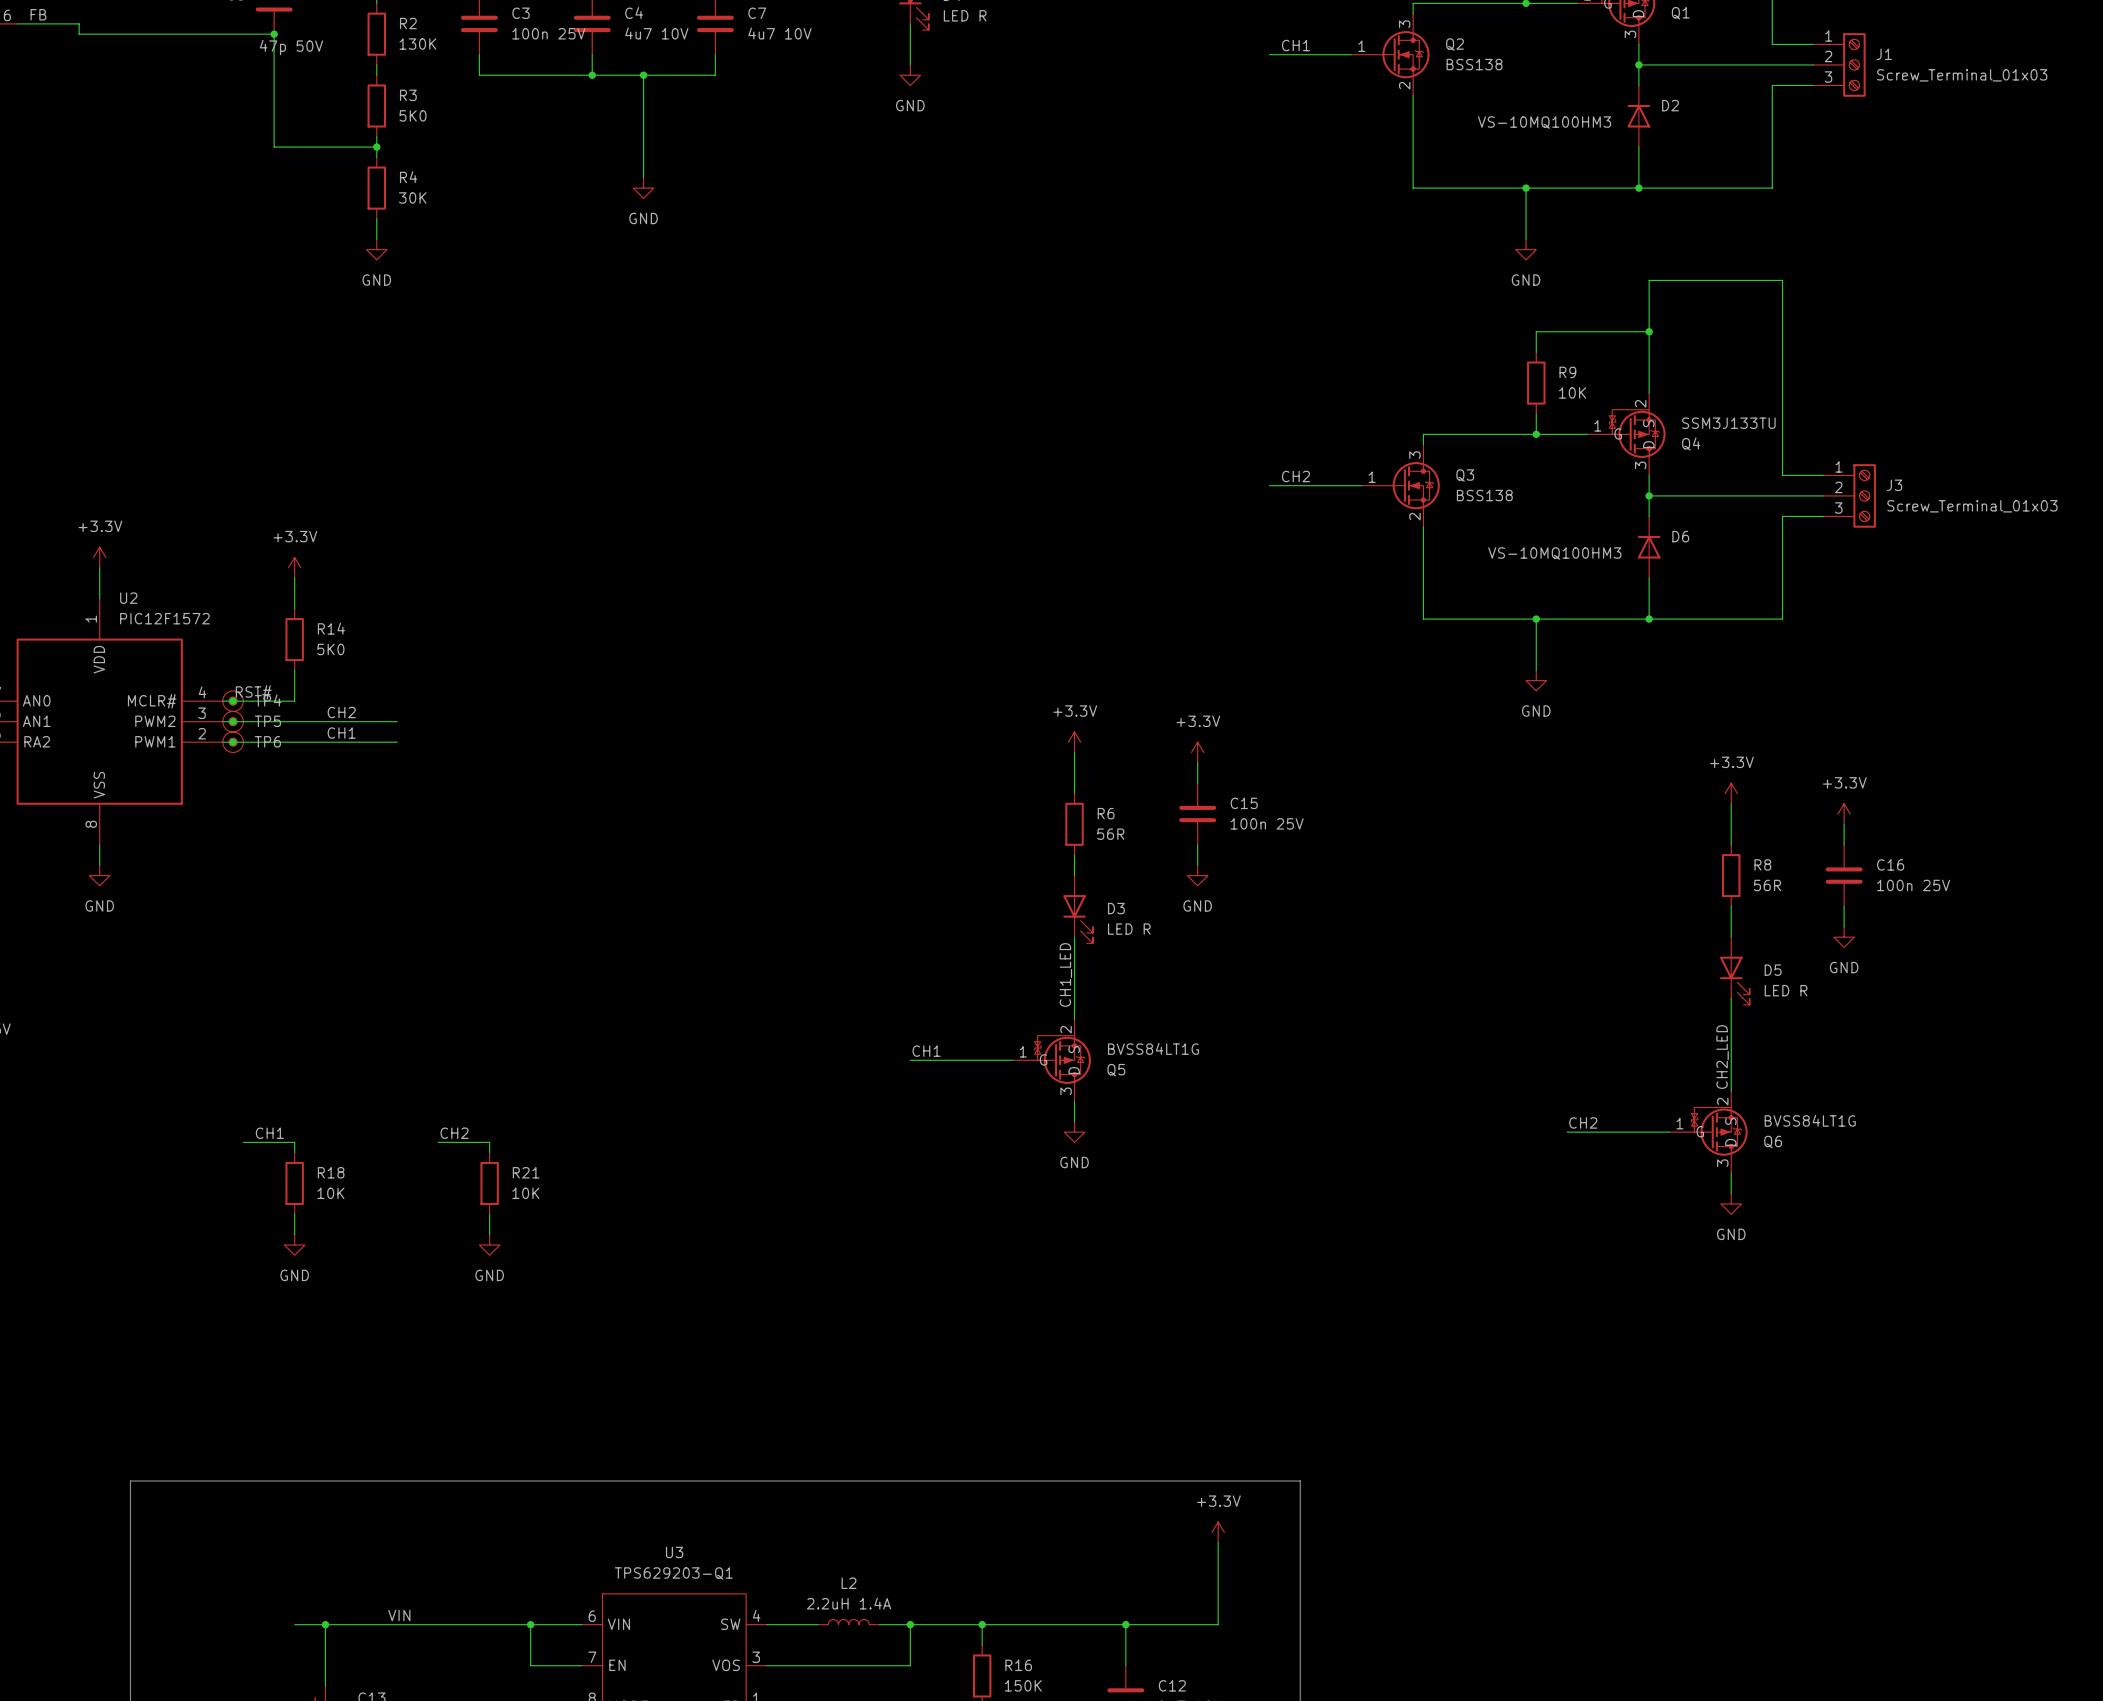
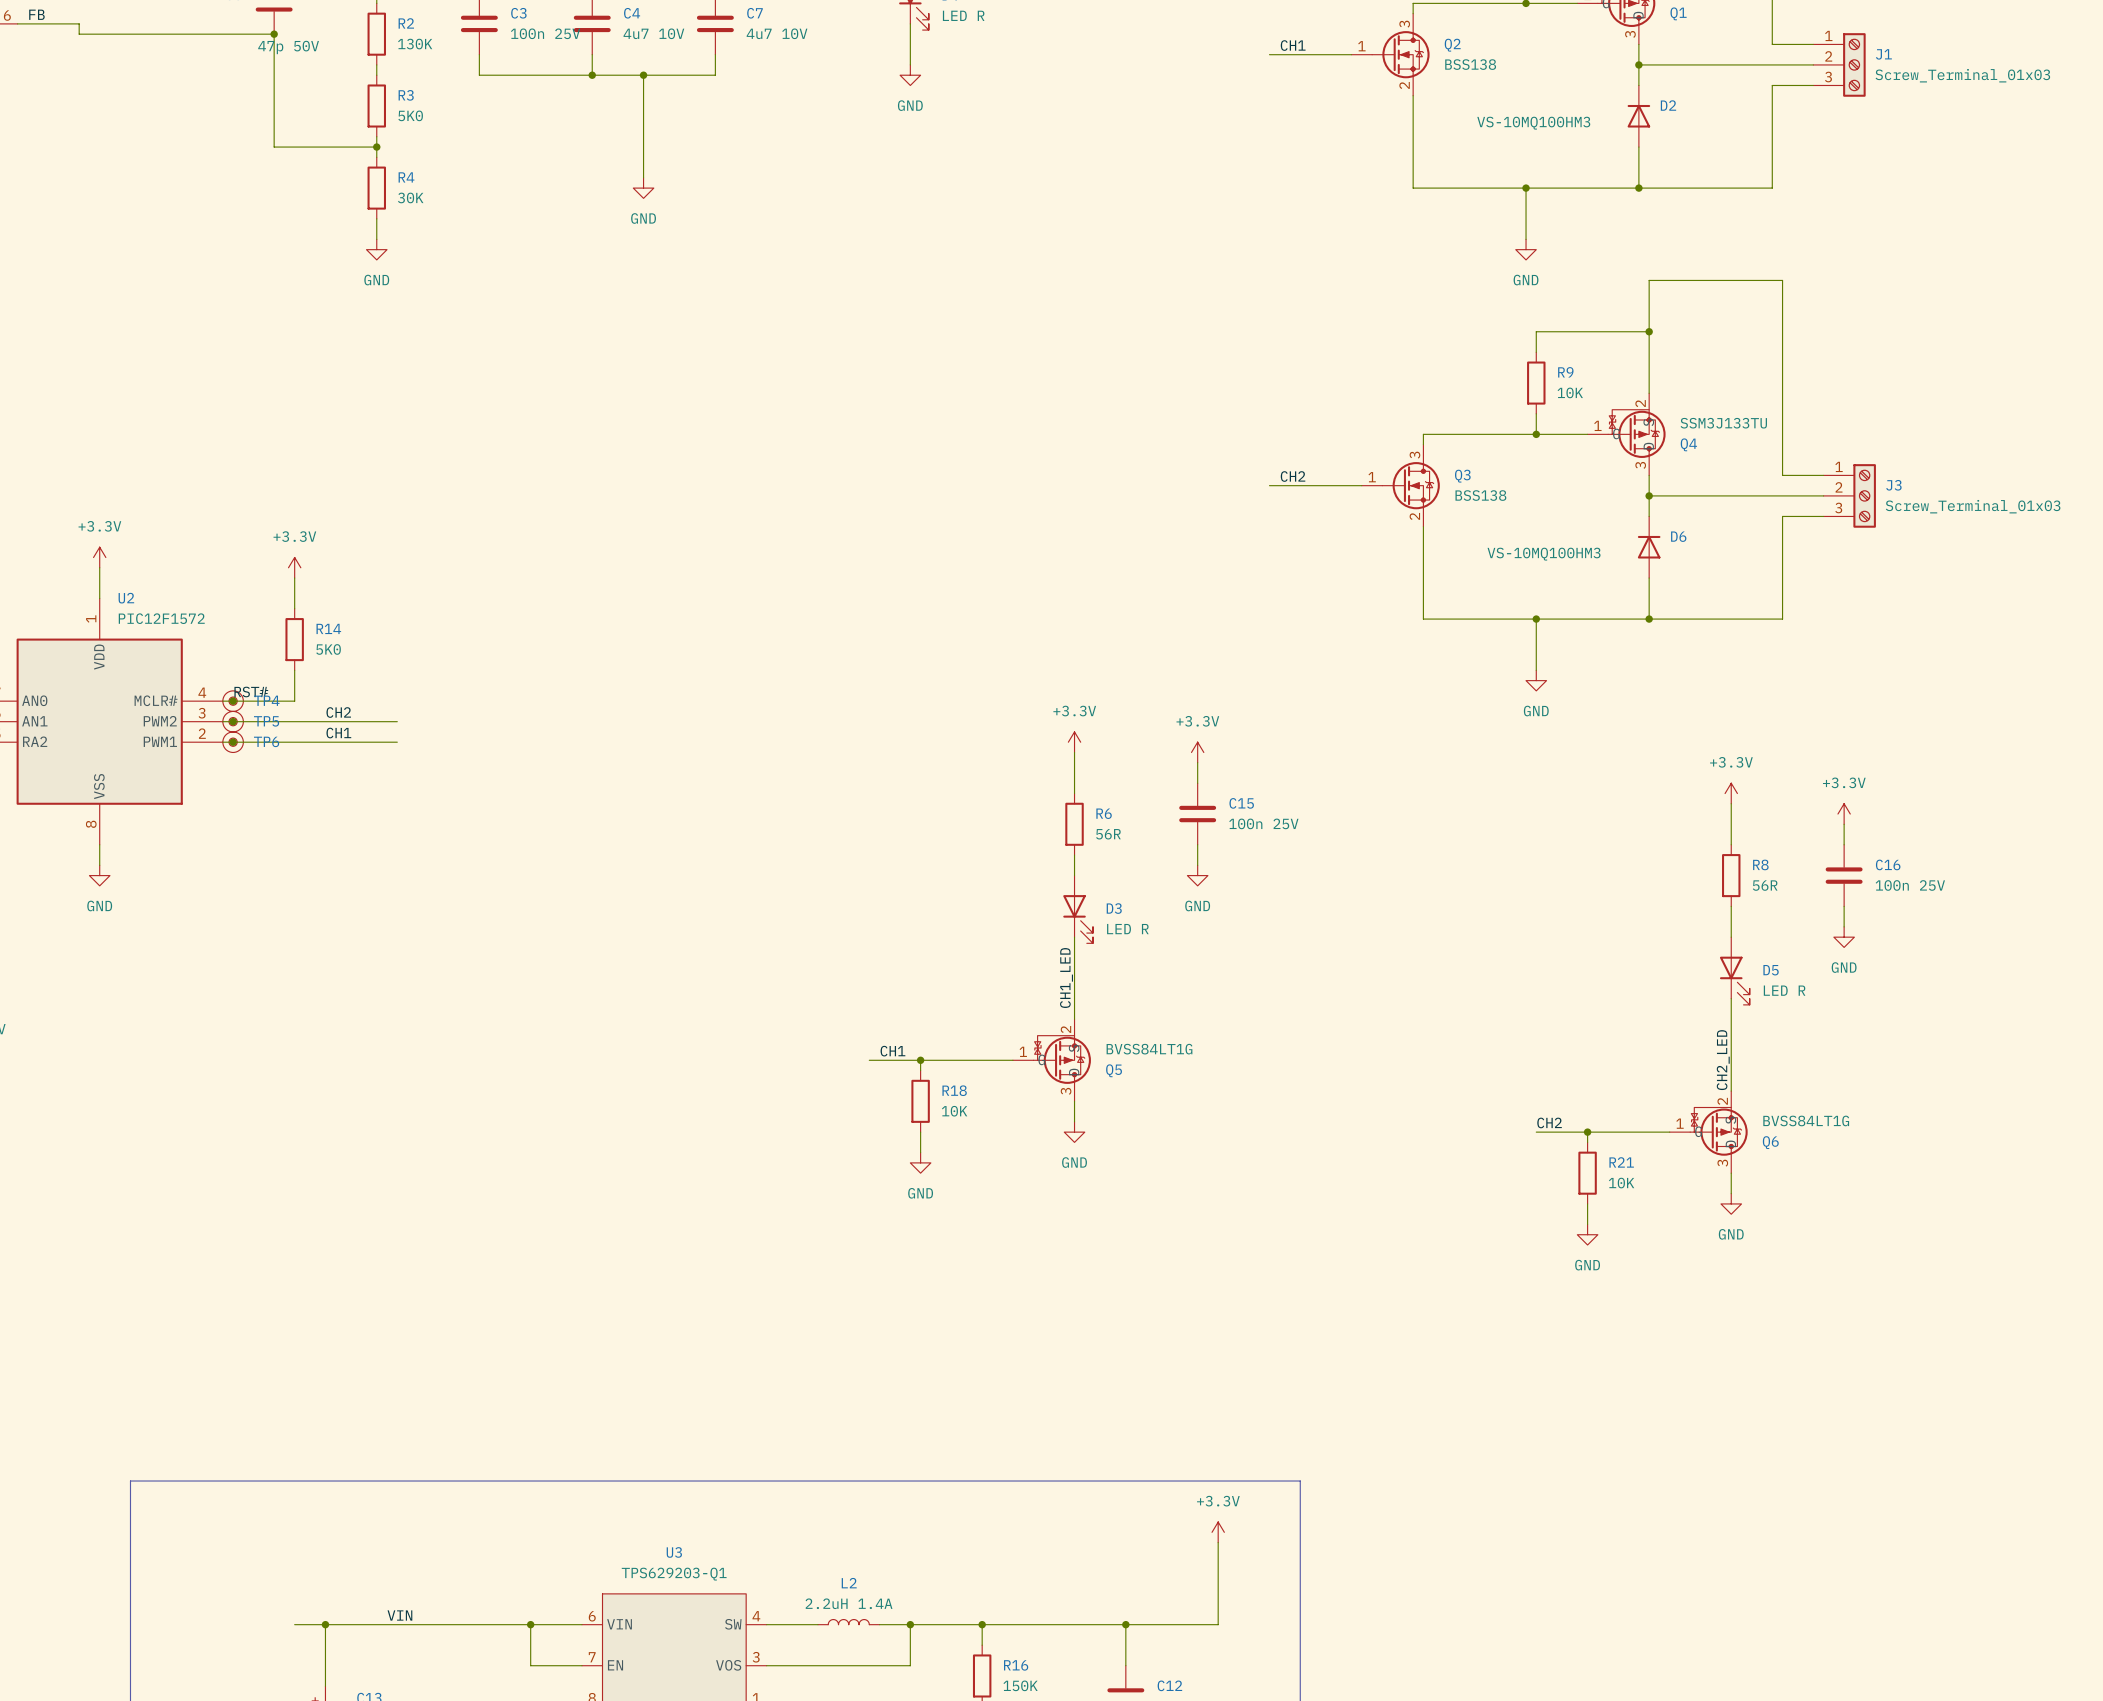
label position: CH1 (926, 1051) -> CH1 (892, 1051)
wire: none -> (869, 1060) (910, 1060)
wire: none -> (920, 1060) (920, 1070)
junction: none -> (920, 1060)
label position: CH2 (1583, 1122) -> CH2 (1549, 1122)
wire: none -> (920, 1132) (920, 1152)
wire: none -> (1536, 1132) (1567, 1132)
wire: none -> (1587, 1132) (1587, 1142)
junction: none -> (1587, 1132)
label: CH1 (269, 1133) -> none
label: CH2 (454, 1133) -> none
wire: (243, 1142) (294, 1142) (294, 1152) -> none
wire: (438, 1142) (489, 1142) (489, 1152) -> none
power symbol: none -> GND (920, 1162)
R18 position: (294, 1183) -> (920, 1101)
R21 position: (489, 1183) -> (1587, 1173)
wire: none -> (1587, 1203) (1587, 1224)
wire: (294, 1214) (294, 1234) -> none
wire: (489, 1214) (489, 1234) -> none
power symbol: none -> GND (1587, 1234)
power symbol: GND (294, 1245) -> none
power symbol: GND (489, 1245) -> none

